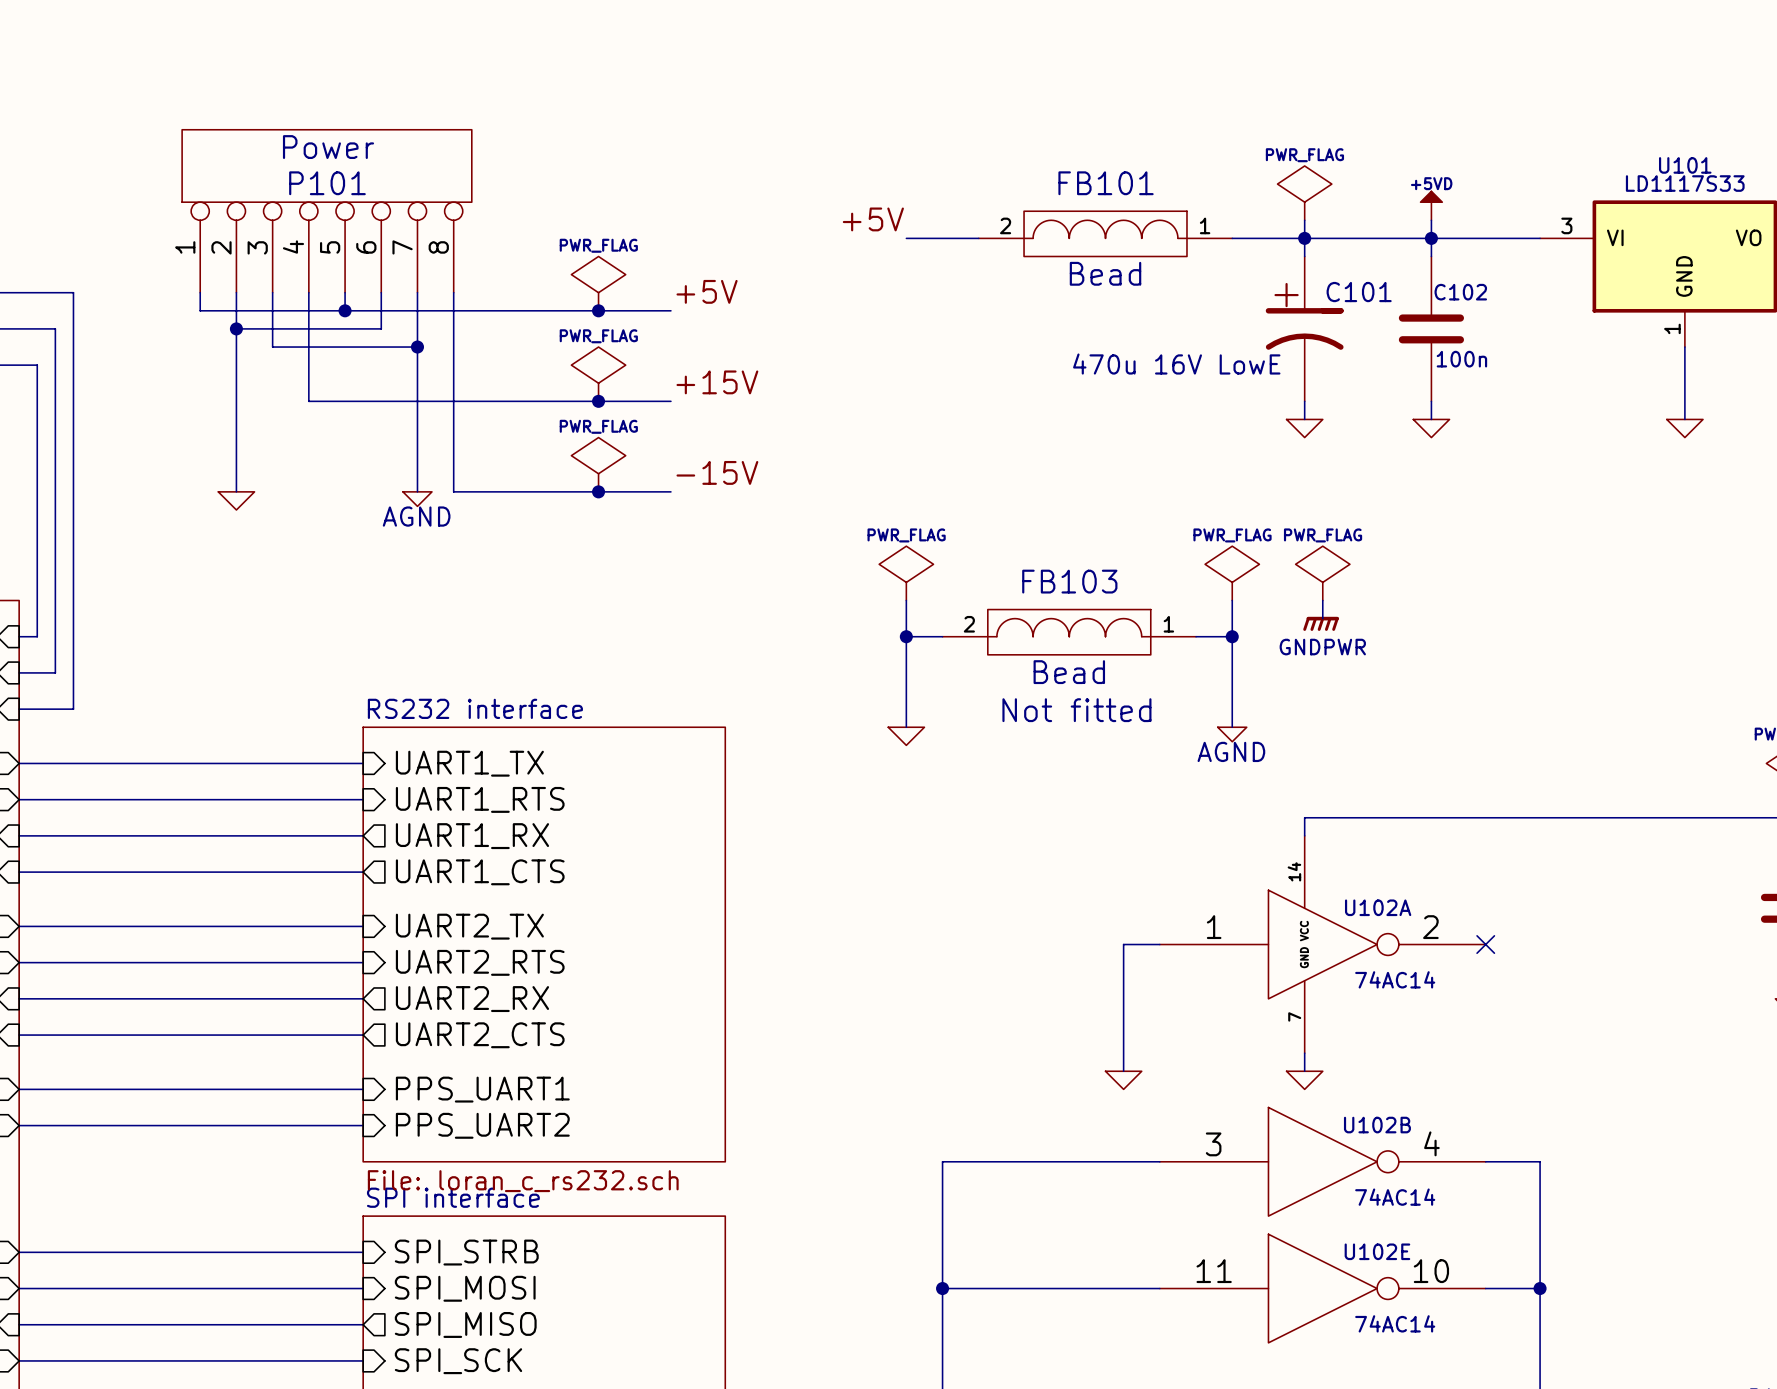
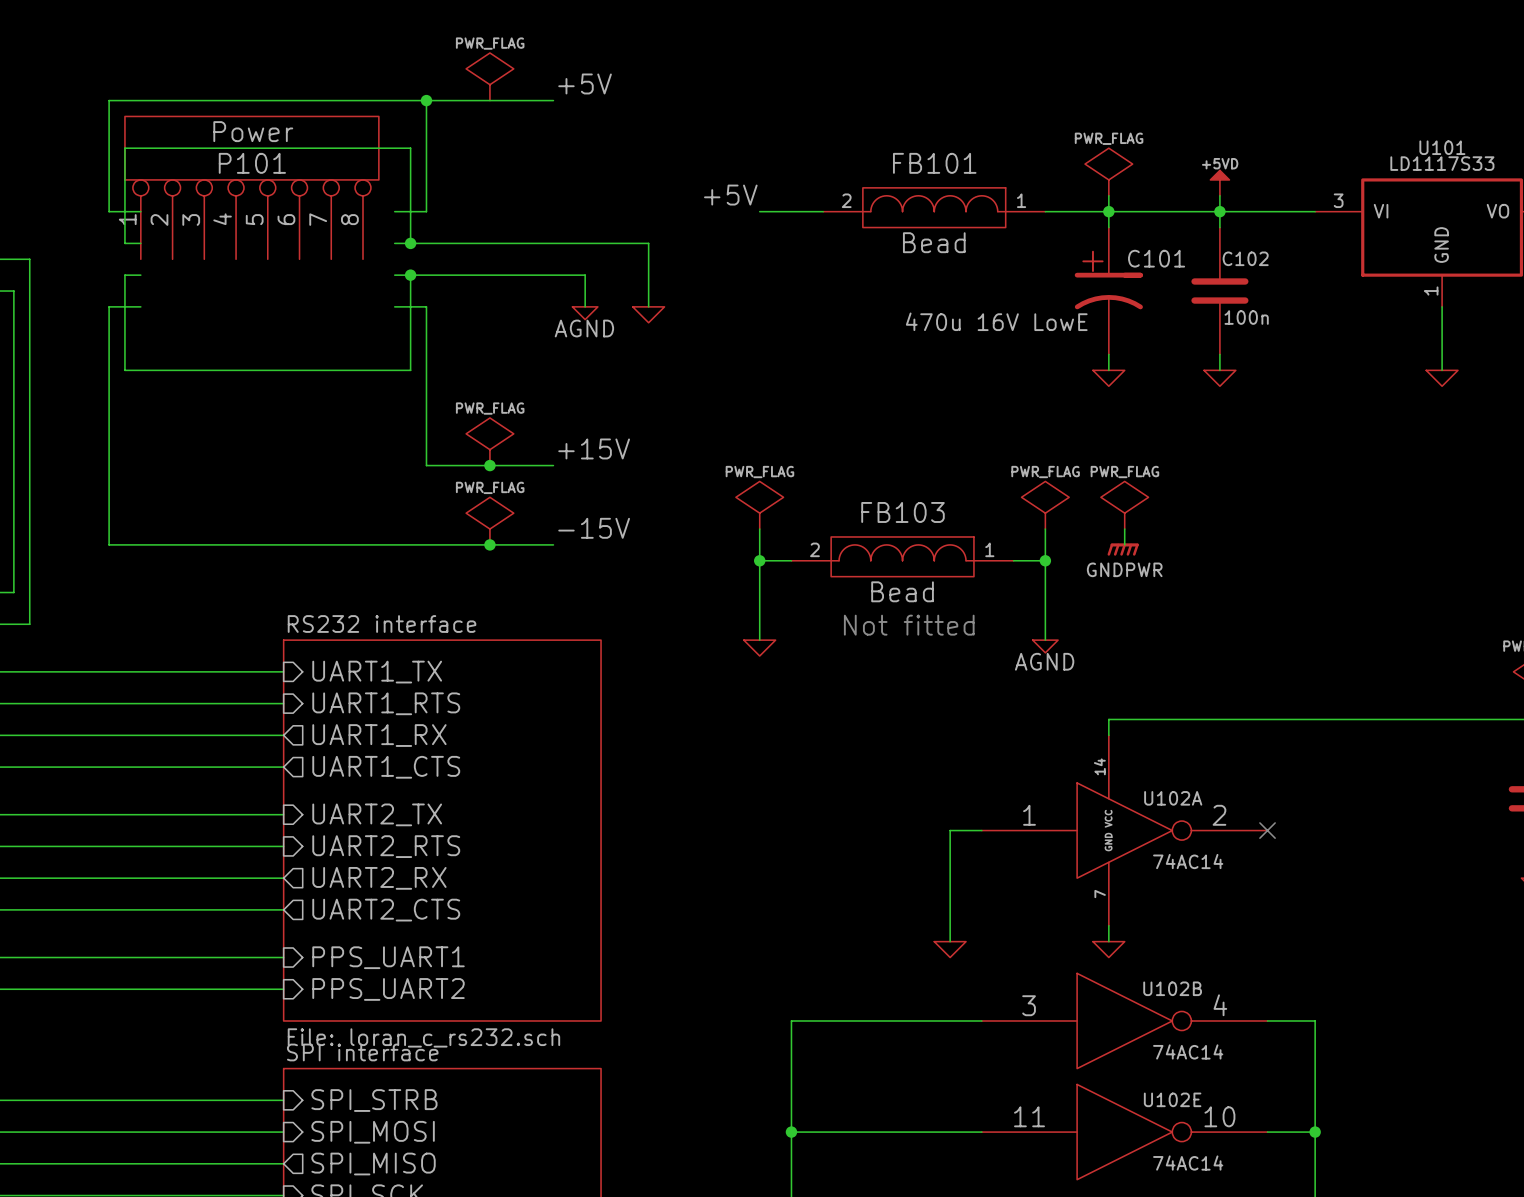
power symbol: none -> PWR_FLAG (489, 76)
wire: none -> (426, 100) (426, 211) (394, 211)
junction: none -> (426, 100)
wire: none -> (553, 100) (109, 100) (109, 211) (140, 211)
wire: none -> (140, 243) (124, 243) (124, 148) (410, 148) (410, 243)
wire: none -> (394, 243) (648, 243) (648, 306)
junction: none -> (410, 243)
power symbol: PWR_FLAG (598, 283) -> none
label position: +5V (707, 291) -> +5V (585, 83)
wire: (200, 292) (200, 310) (489, 310) -> none
wire: (236, 292) (236, 491) -> none
wire: (272, 292) (272, 347) (417, 347) -> none
wire: (308, 292) (308, 401) (670, 401) -> none
wire: (345, 292) (345, 310) -> none
wire: (381, 292) (381, 328) (236, 328) -> none
wire: (417, 292) (417, 491) -> none
wire: (453, 292) (453, 491) (670, 491) -> none
wire: none -> (140, 275) (124, 275) (124, 370) (410, 370) (410, 275)
junction: (345, 310) -> none
junction: none -> (410, 275)
junction: (598, 310) -> none
wire: none -> (553, 275) (585, 275) (585, 306)
junction: (236, 328) -> none
wire: none -> (140, 306) (109, 306) (109, 544) (553, 544)
junction: (417, 347) -> none
wire: none -> (394, 306) (426, 306) (426, 465) (553, 465)
power symbol: none -> (648, 314)
power symbol: PWR_FLAG (598, 374) -> none
label position: +15V (717, 382) -> +15V (594, 448)
junction: (598, 401) -> none
power symbol position: PWR_FLAG (598, 464) -> PWR_FLAG (489, 441)
label position: -15V (717, 472) -> -15V (594, 528)
junction position: (598, 491) -> (489, 465)
power symbol position: AGND (417, 499) -> AGND (585, 313)
power symbol: (236, 500) -> none
power symbol: none -> PWR_FLAG (489, 521)
junction: none -> (489, 544)

